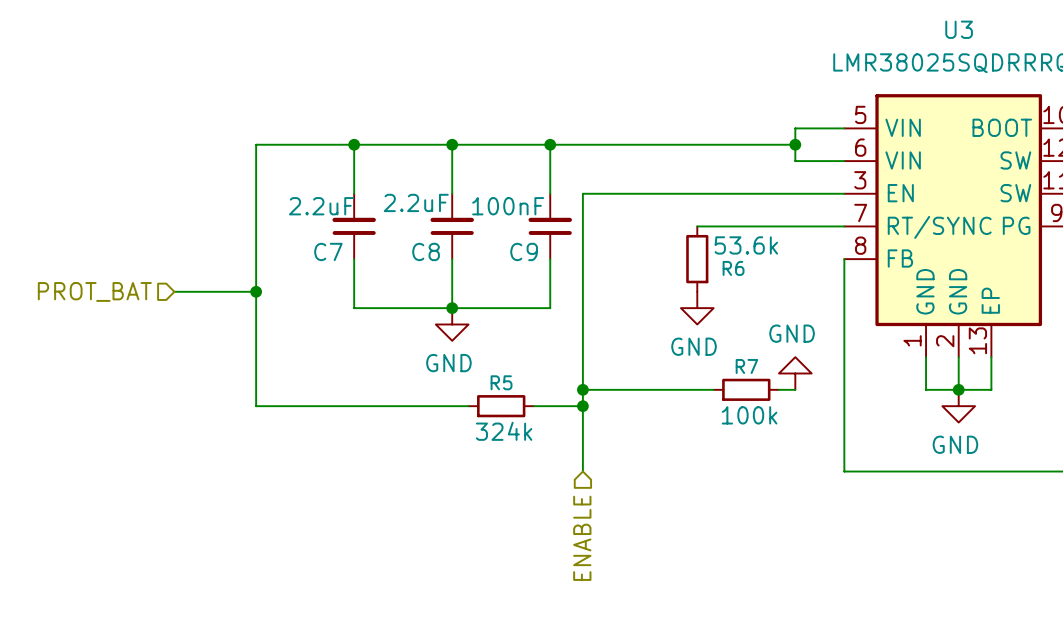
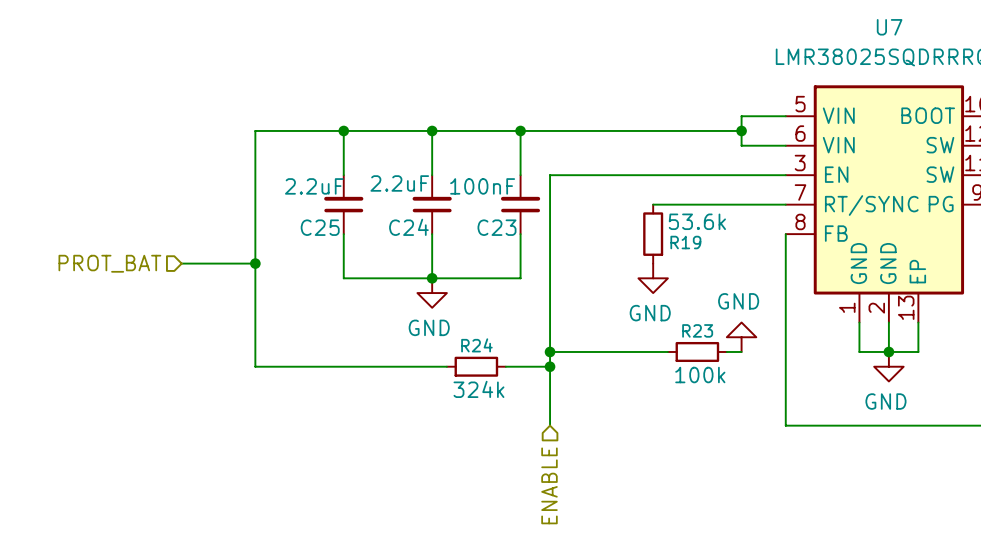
U3 name: U3 (959, 29) -> U7 (889, 27)
C7 name: C7 (328, 251) -> C25 (320, 227)
C8 name: C8 (426, 251) -> C24 (408, 227)
C9 name: C9 (524, 251) -> C23 (496, 227)
R6 name: R6 (733, 268) -> R19 (685, 242)
R7 name: R7 (746, 366) -> R23 (697, 330)
R5 name: R5 (501, 382) -> R24 (476, 345)

